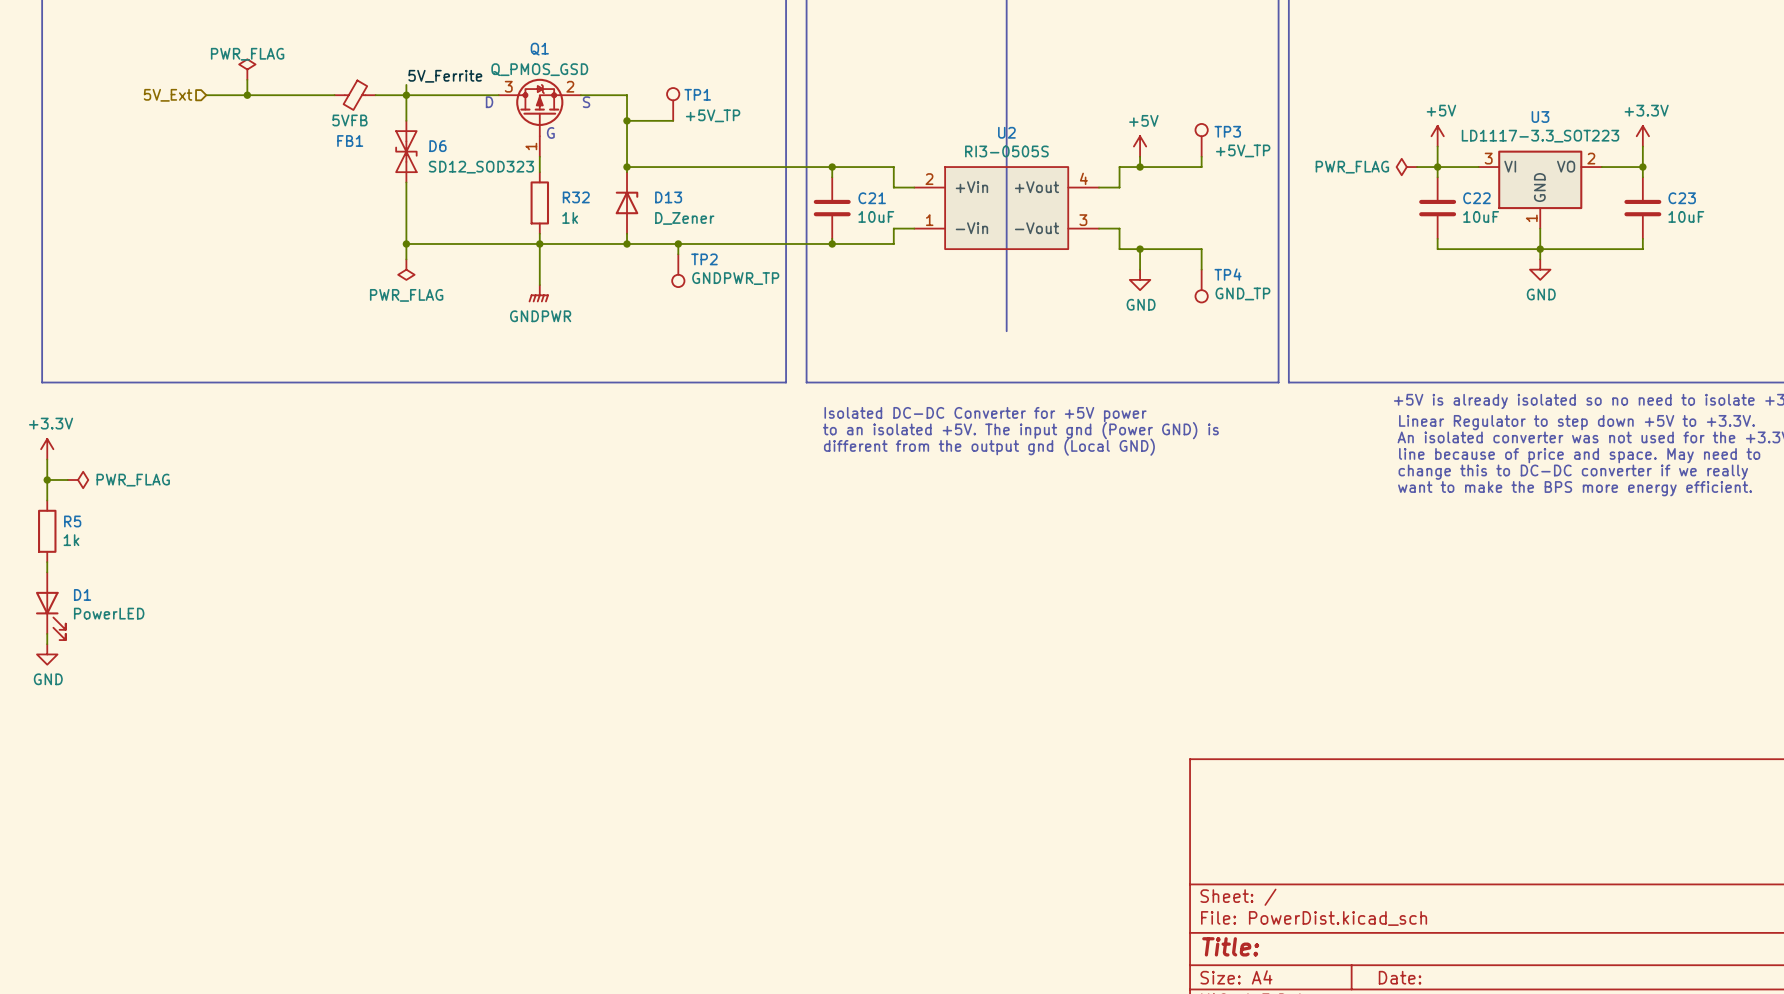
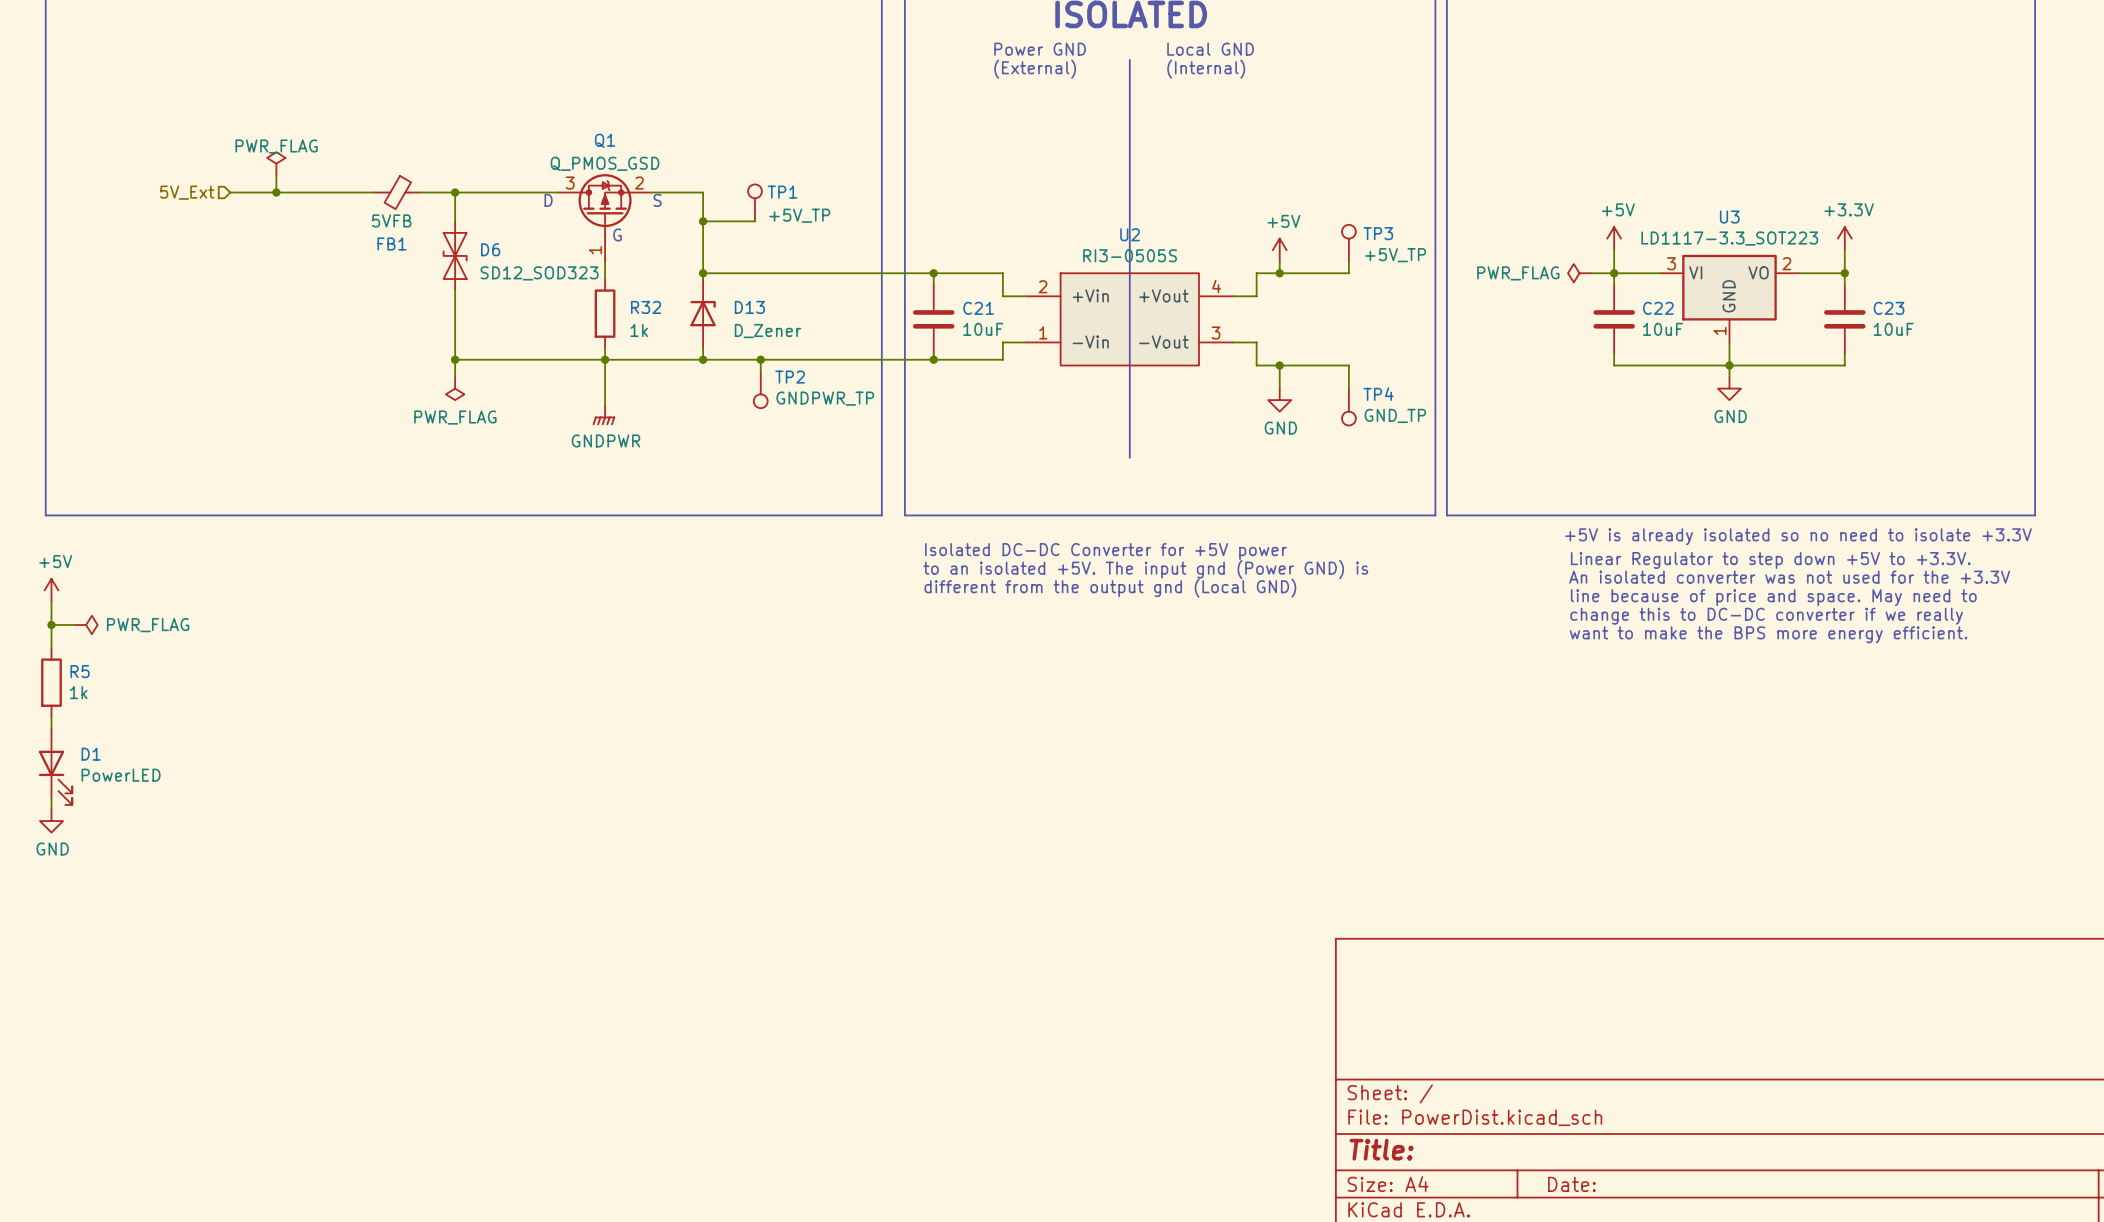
label: 5V_Ferrite (445, 76) -> none
wire: (406, 84) (406, 95) -> none
power symbol: +3.3V (47, 449) -> +5V (51, 590)

